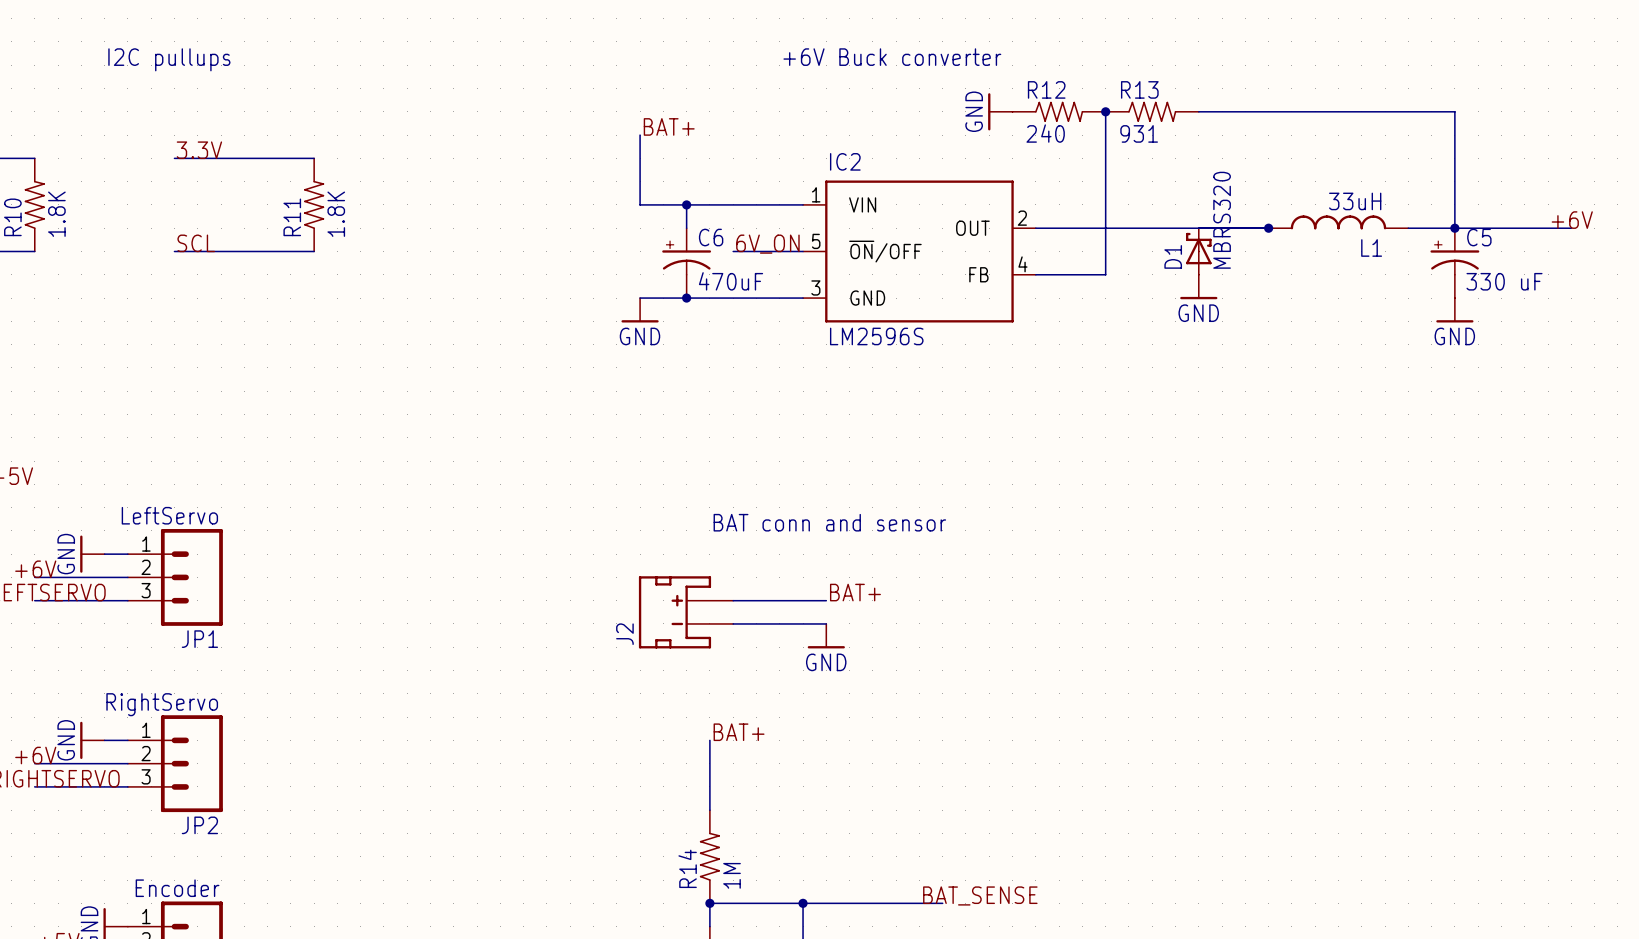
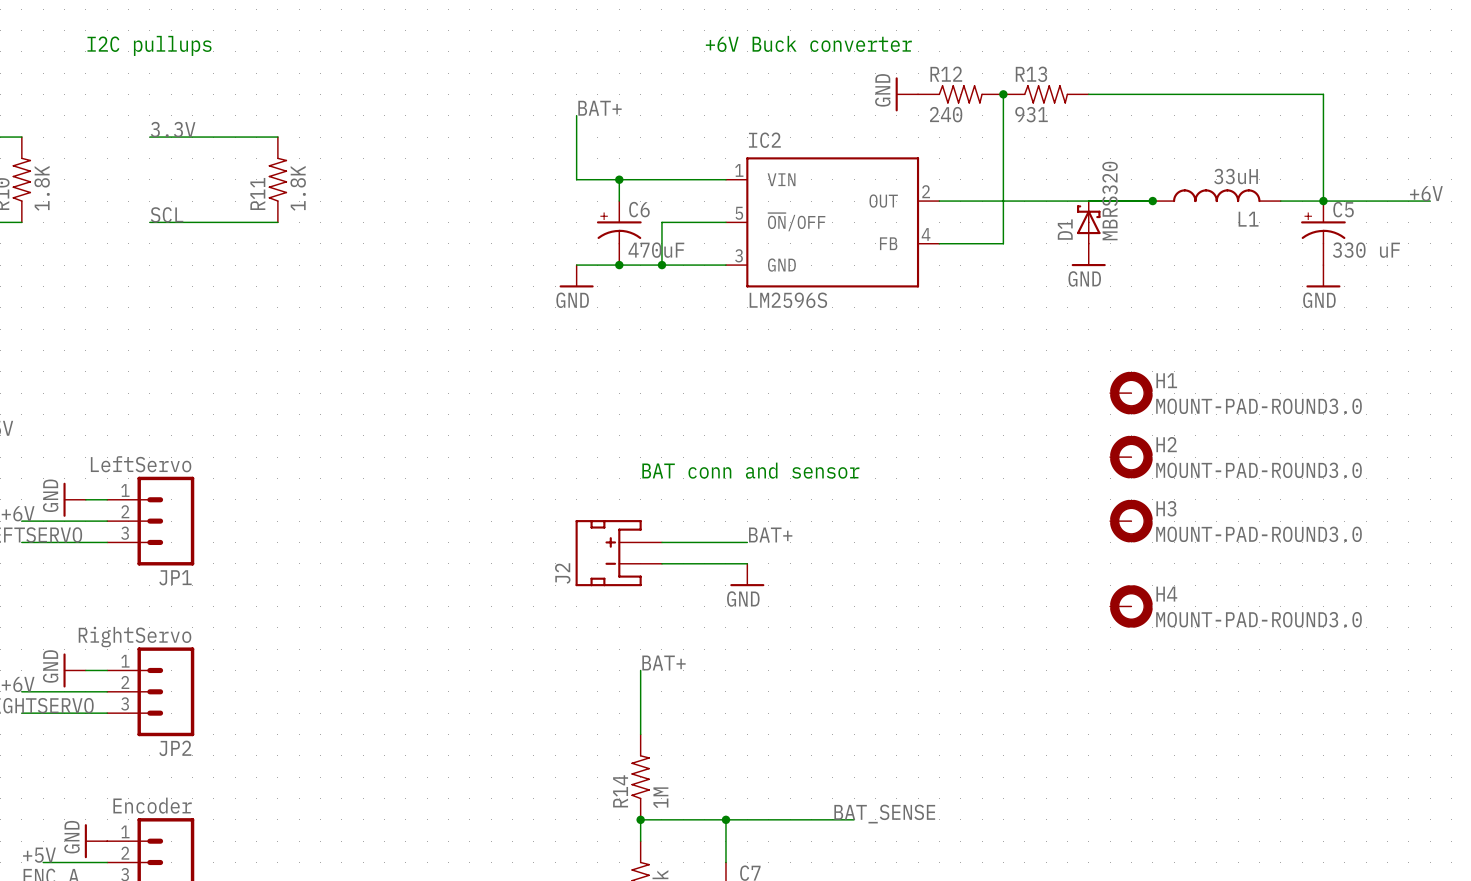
label: 6V_ON (767, 244) -> none
wire: none -> (661, 222) (661, 265)
junction: none -> (661, 265)
H1: none -> MOUNT-PAD-ROUND3.0 (1131, 393)
H2: none -> MOUNT-PAD-ROUND3.0 (1131, 457)
H3: none -> MOUNT-PAD-ROUND3.0 (1131, 521)
H4: none -> MOUNT-PAD-ROUND3.0 (1131, 606)

